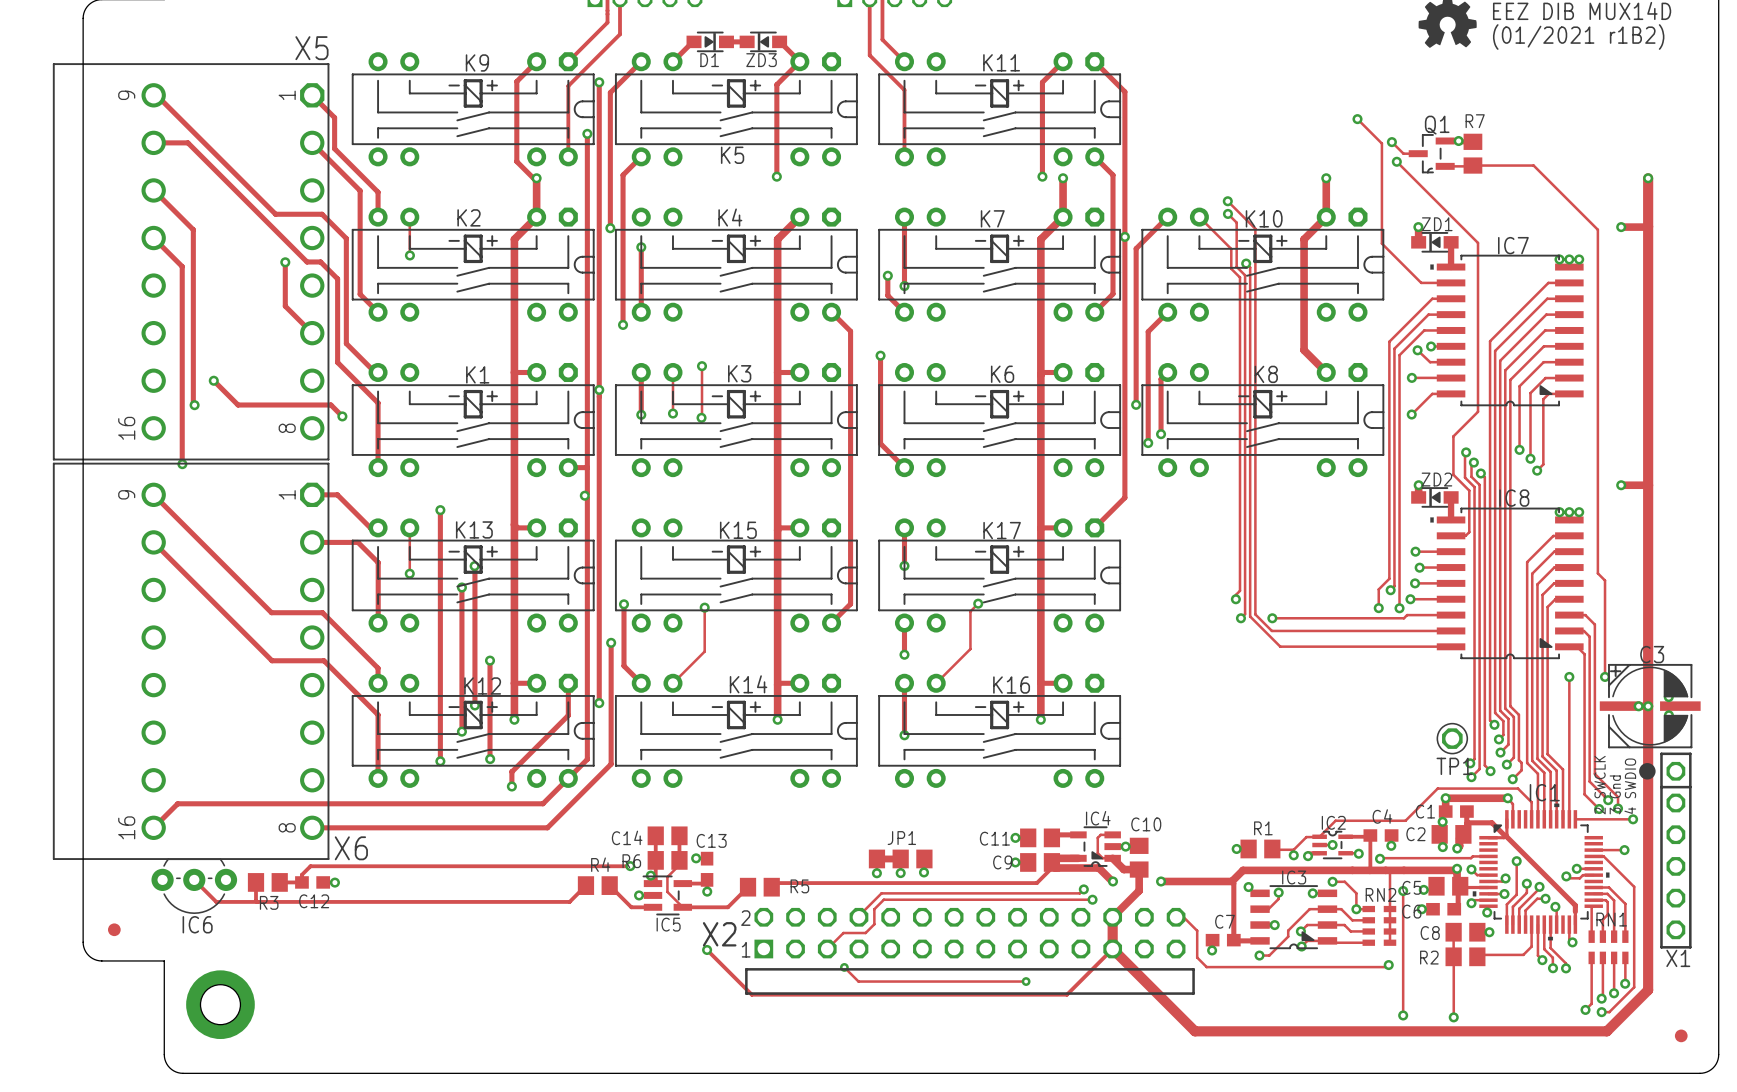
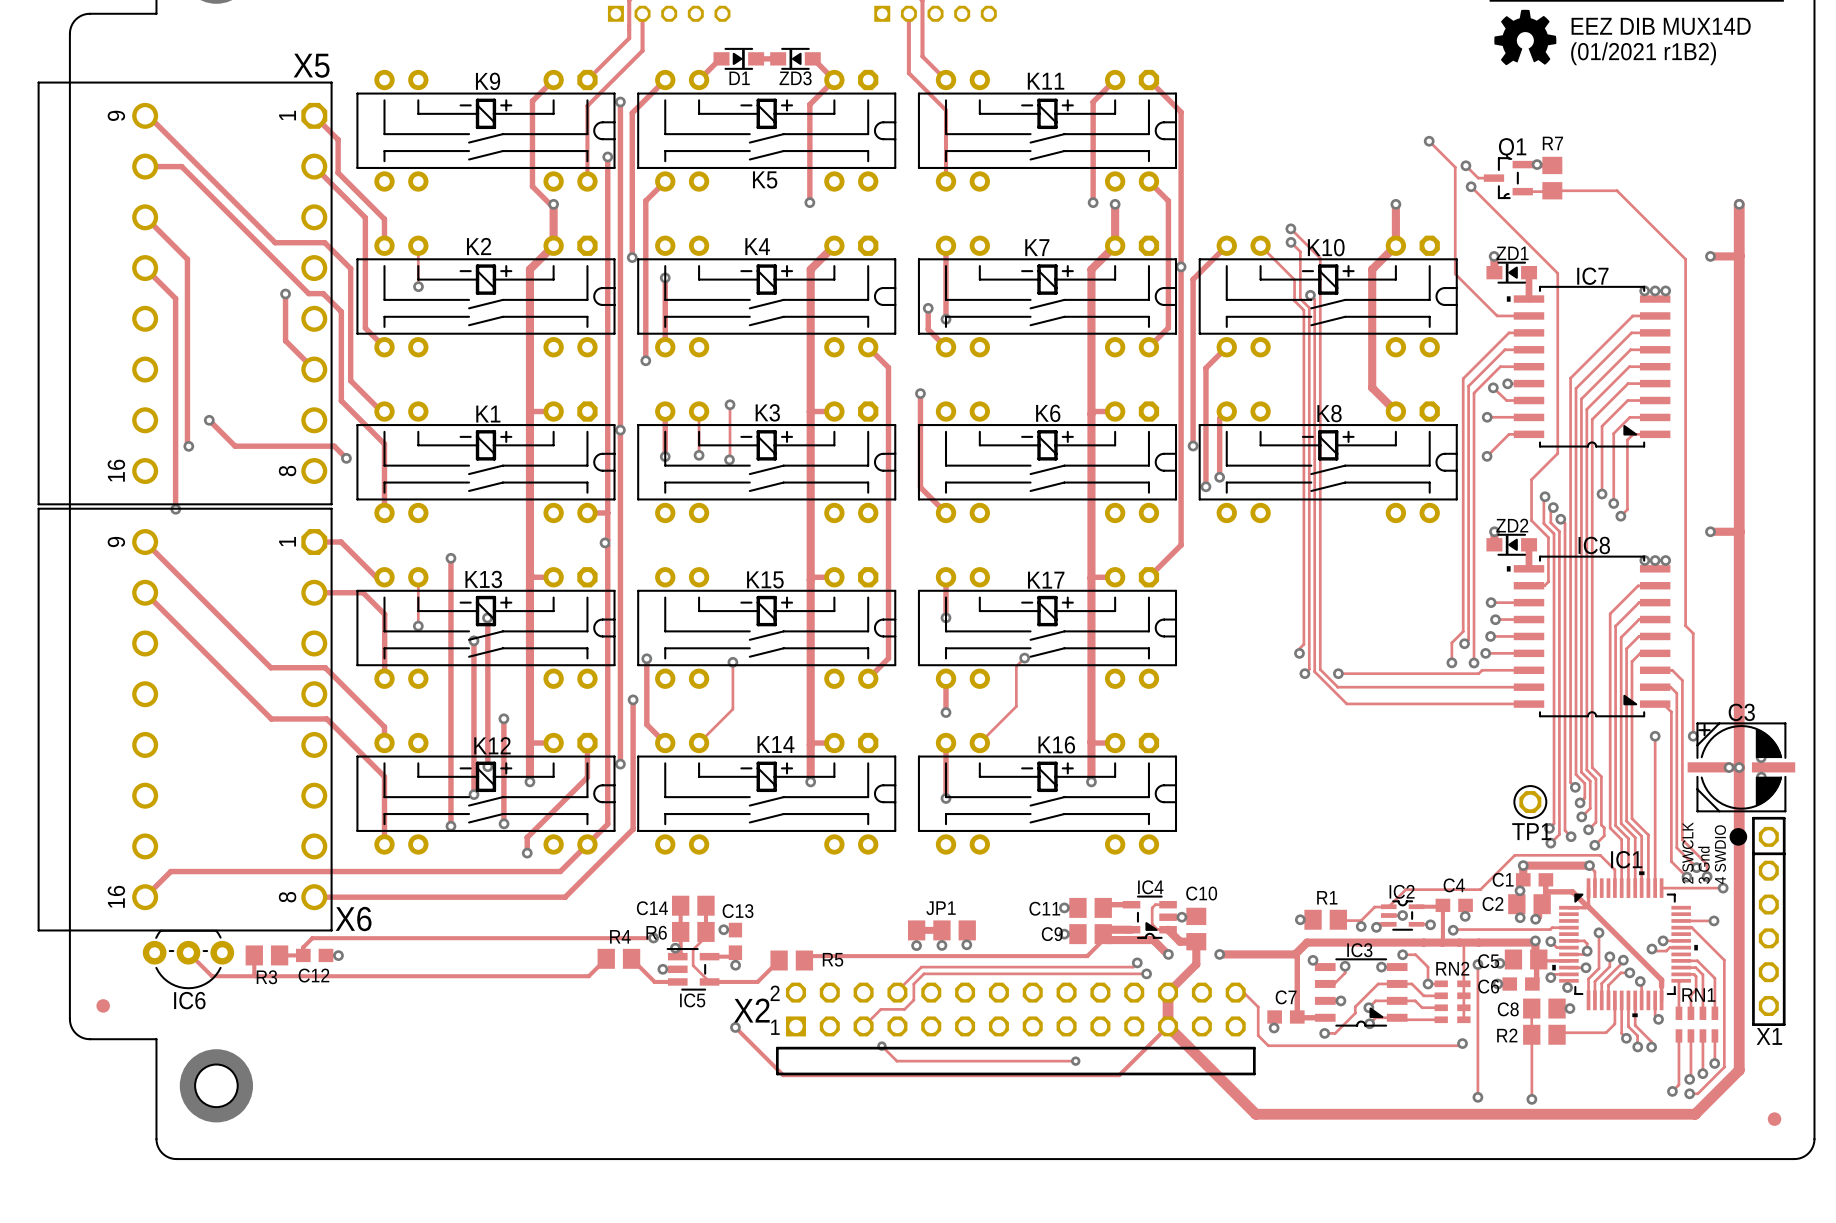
track: none -> (1568, 940) (1584, 940) (1587, 943) (1587, 951)

